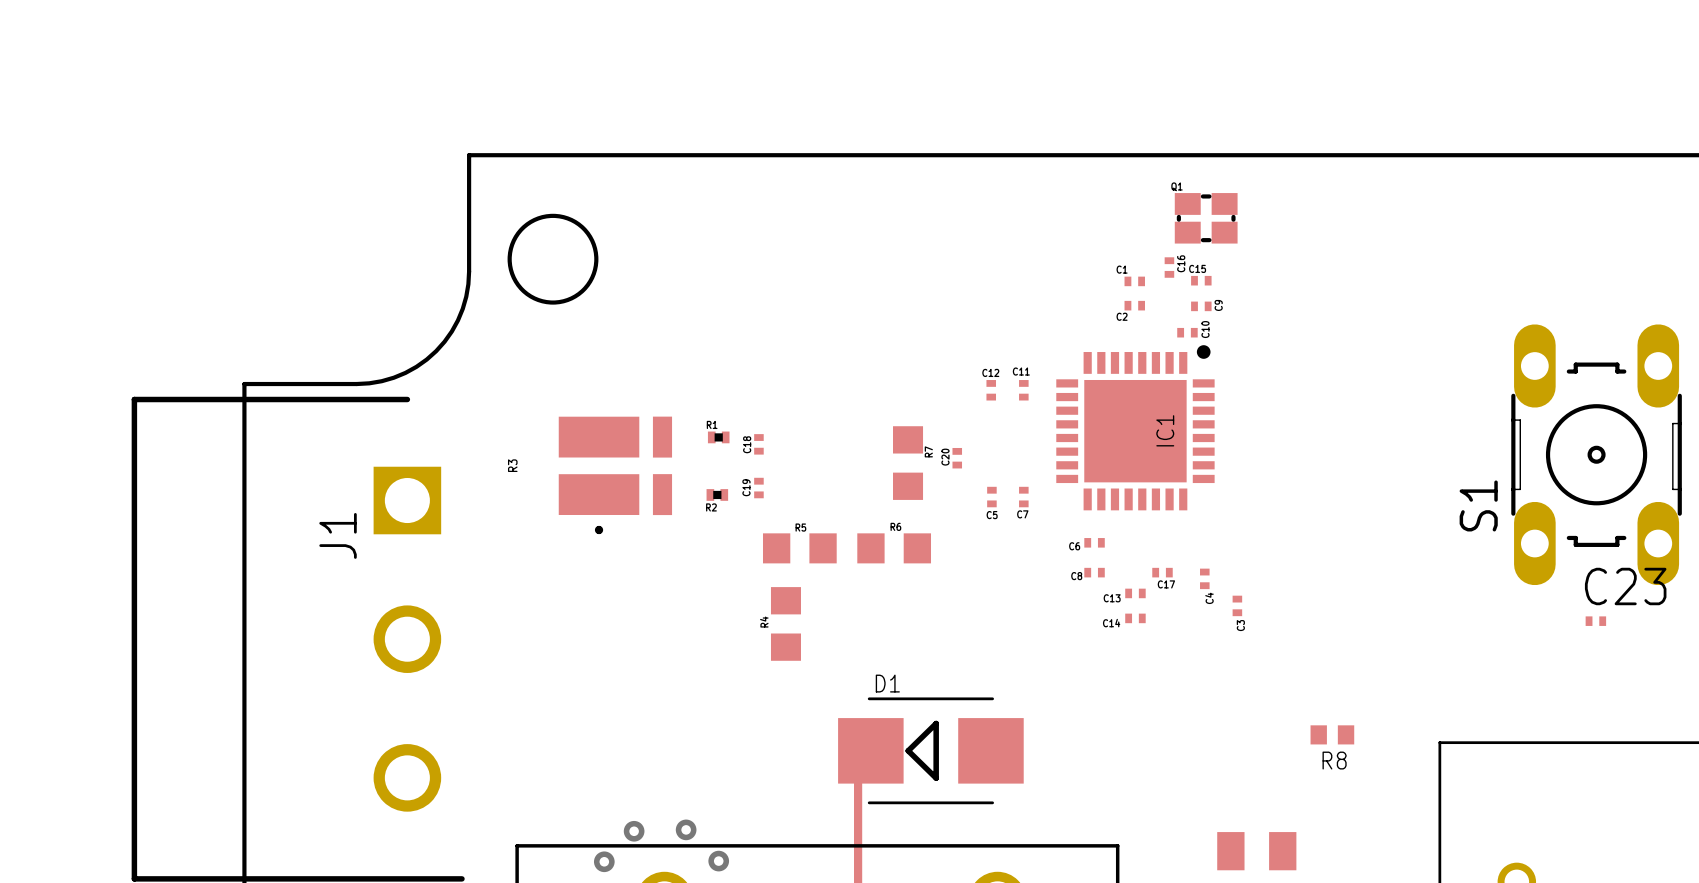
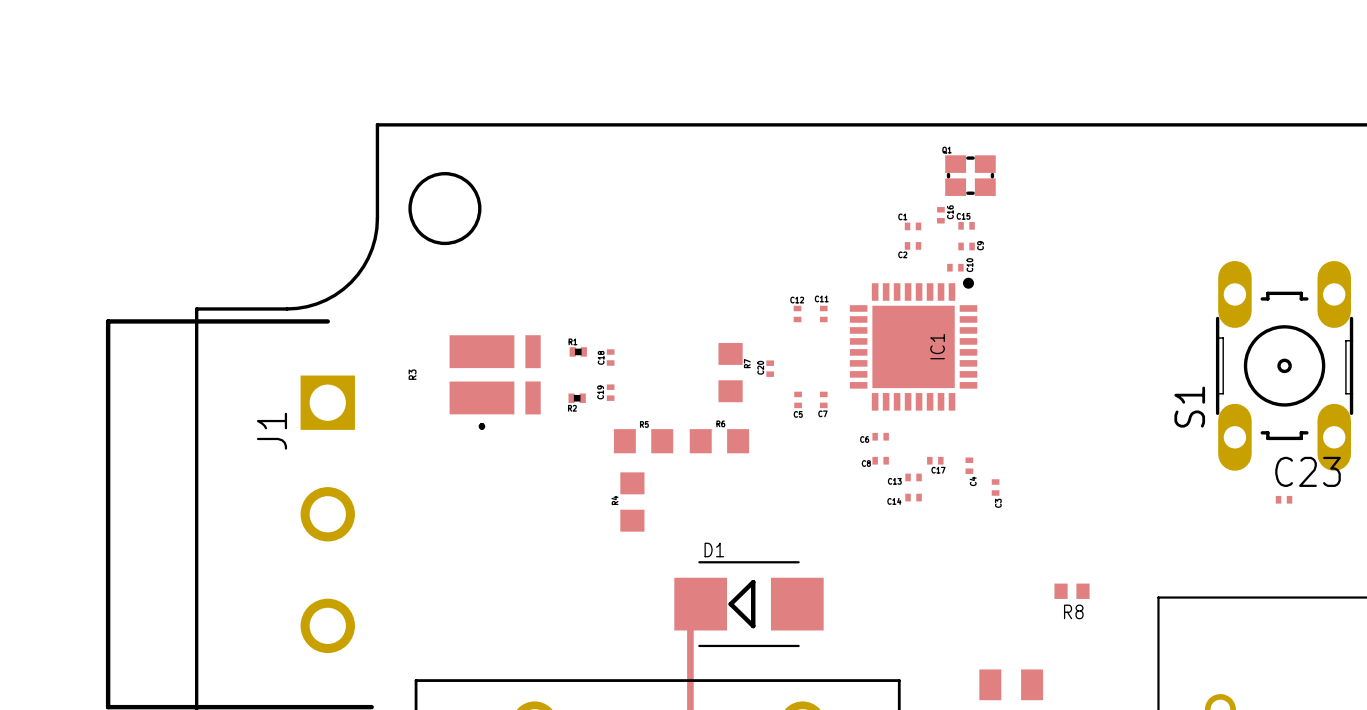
via: (686, 829) -> none
via: (634, 831) -> none
via: (604, 861) -> none
via: (718, 861) -> none

